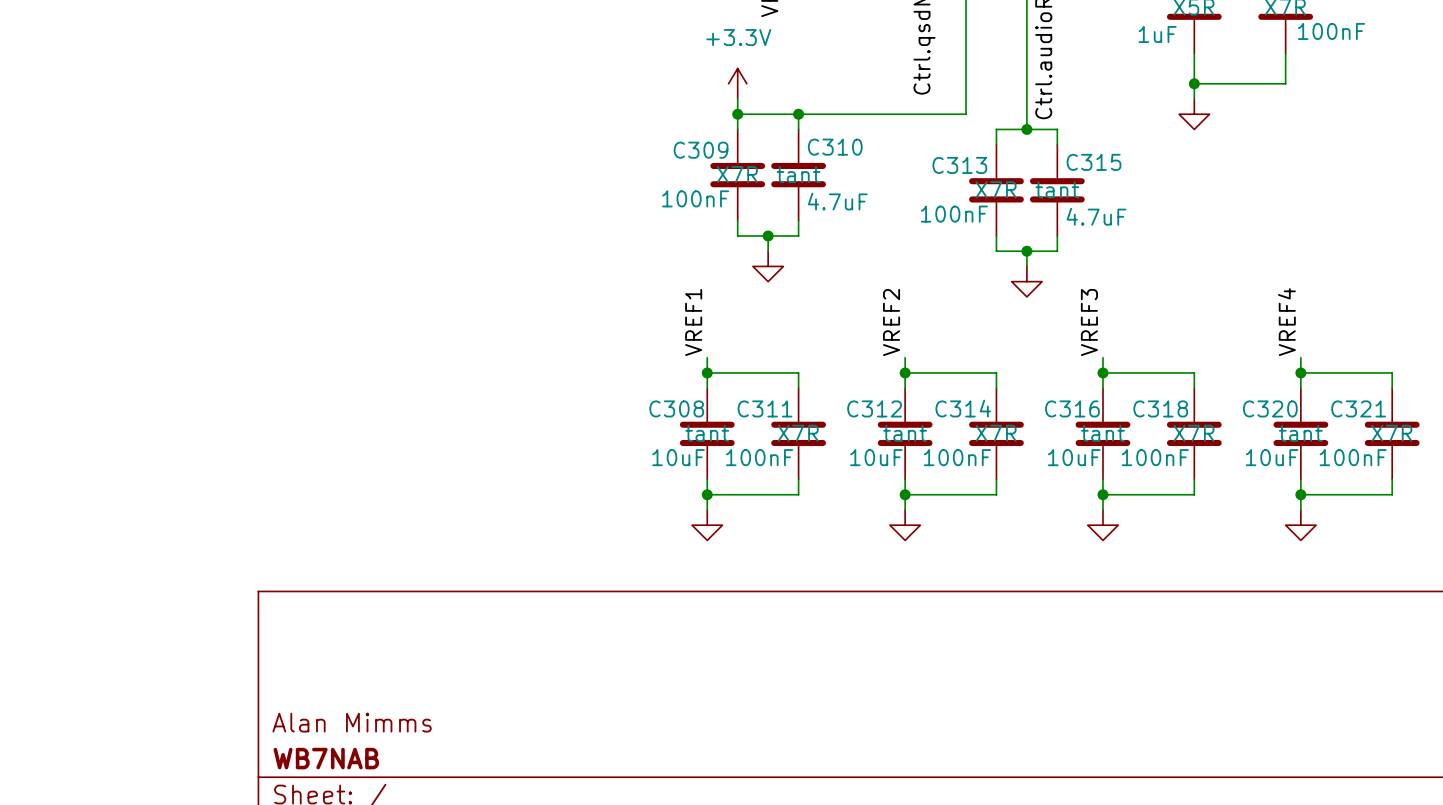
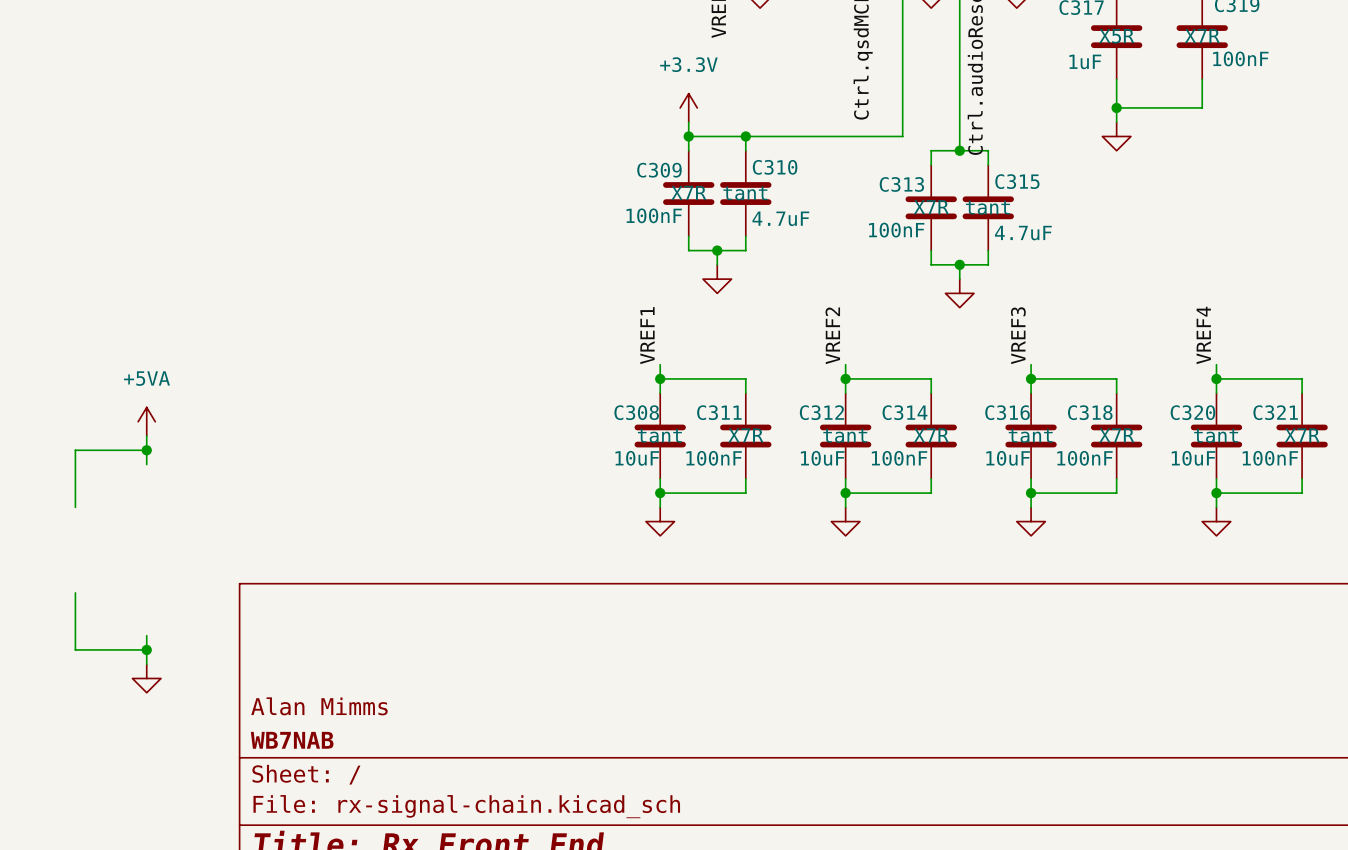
power symbol: none -> +5VA (146, 421)
wire: none -> (146, 436) (146, 464)
wire: none -> (146, 450) (75, 450) (75, 507)
junction: none -> (146, 450)
wire: none -> (75, 592) (75, 649) (146, 649)
wire: none -> (146, 635) (146, 664)
junction: none -> (146, 649)
power symbol: none -> (146, 678)

